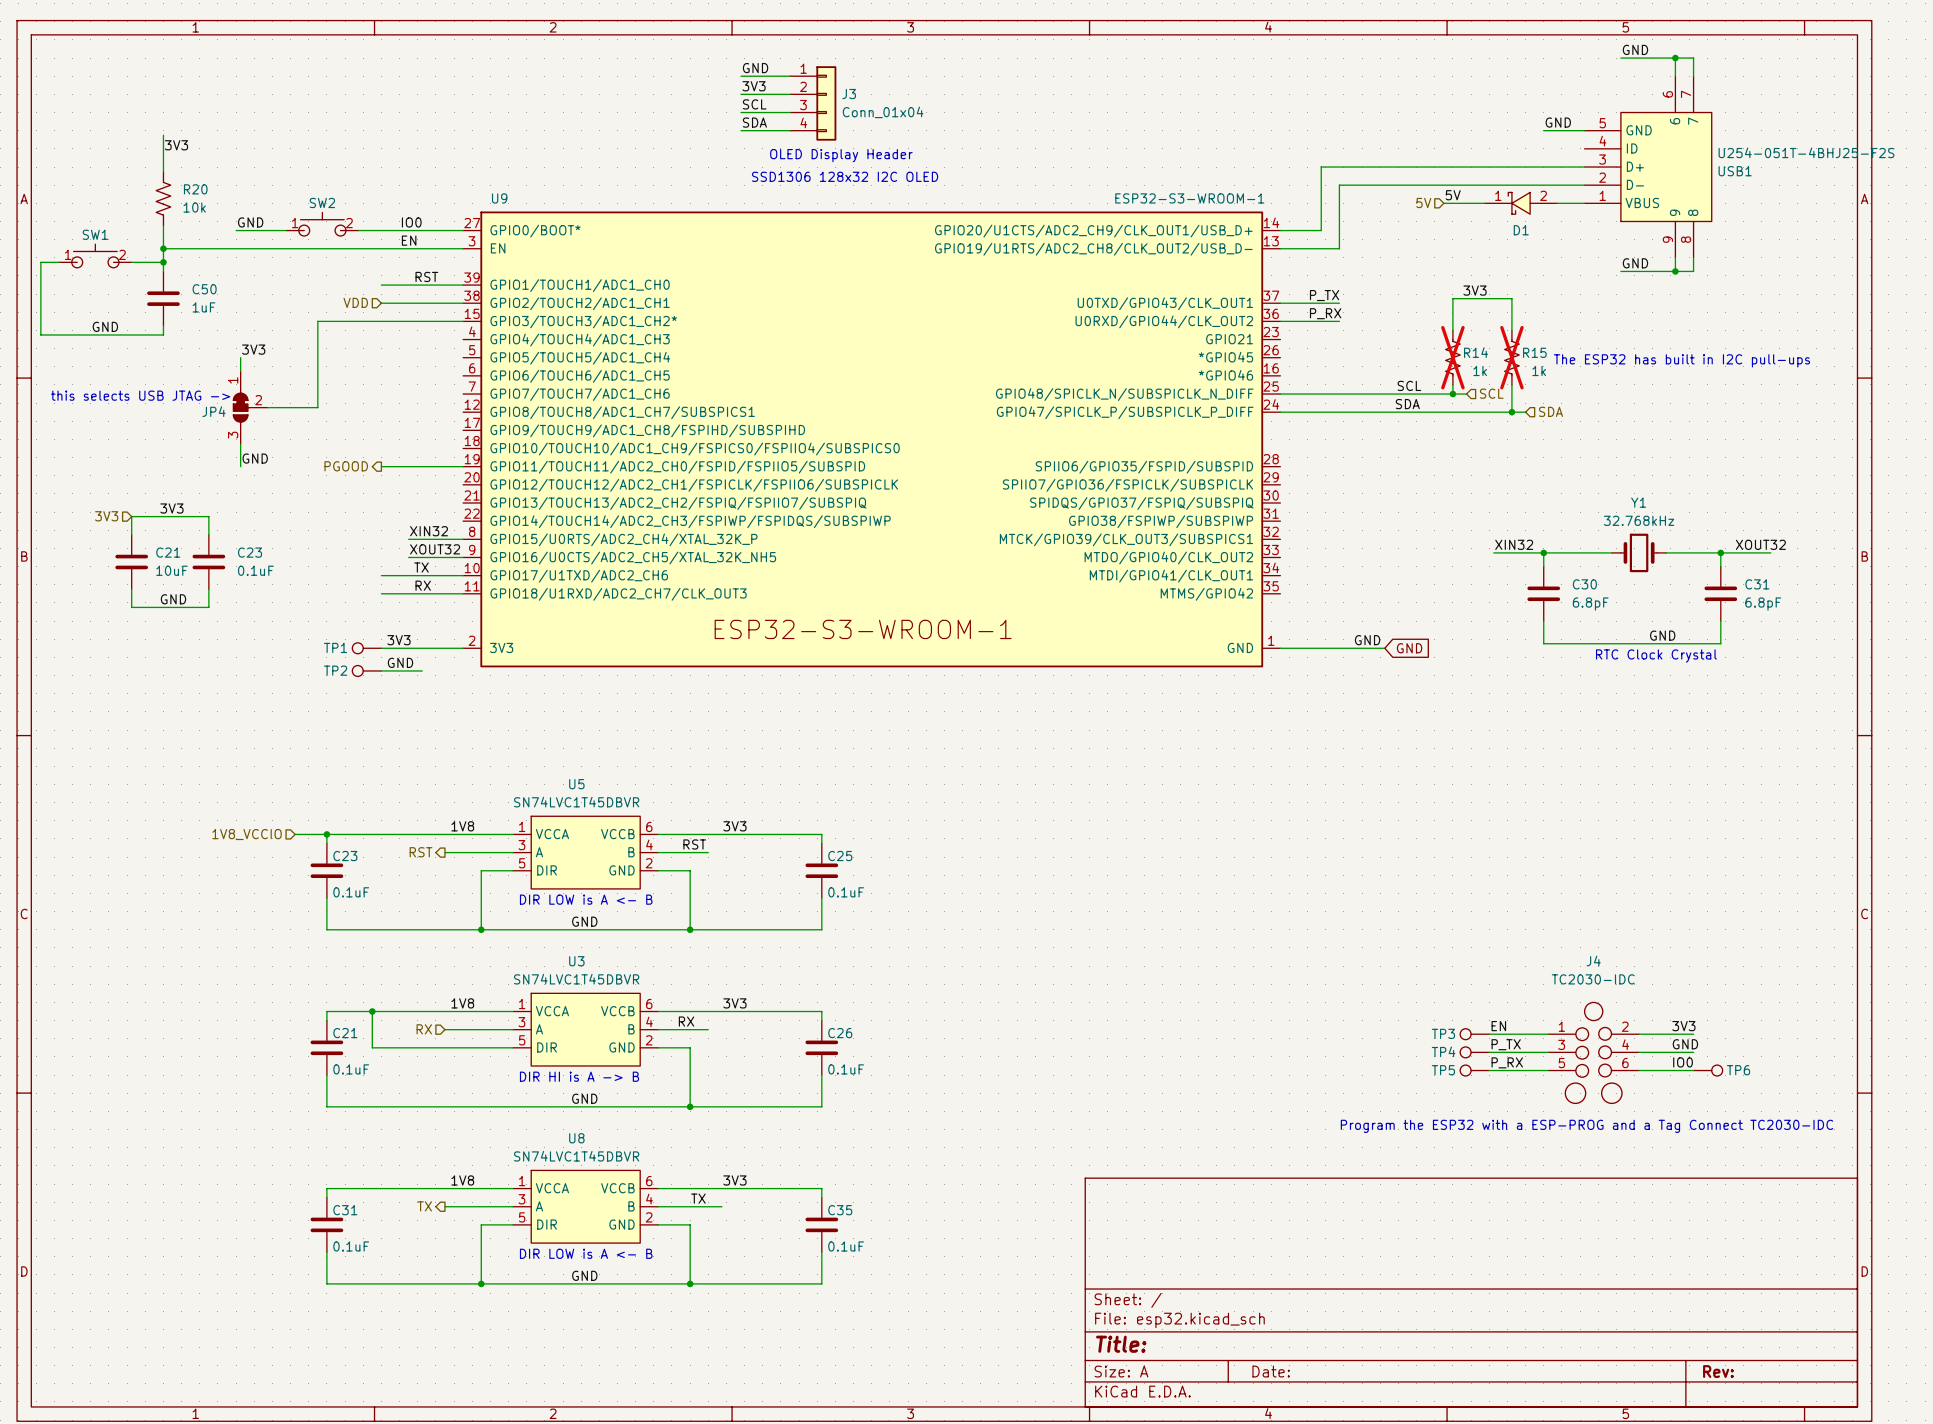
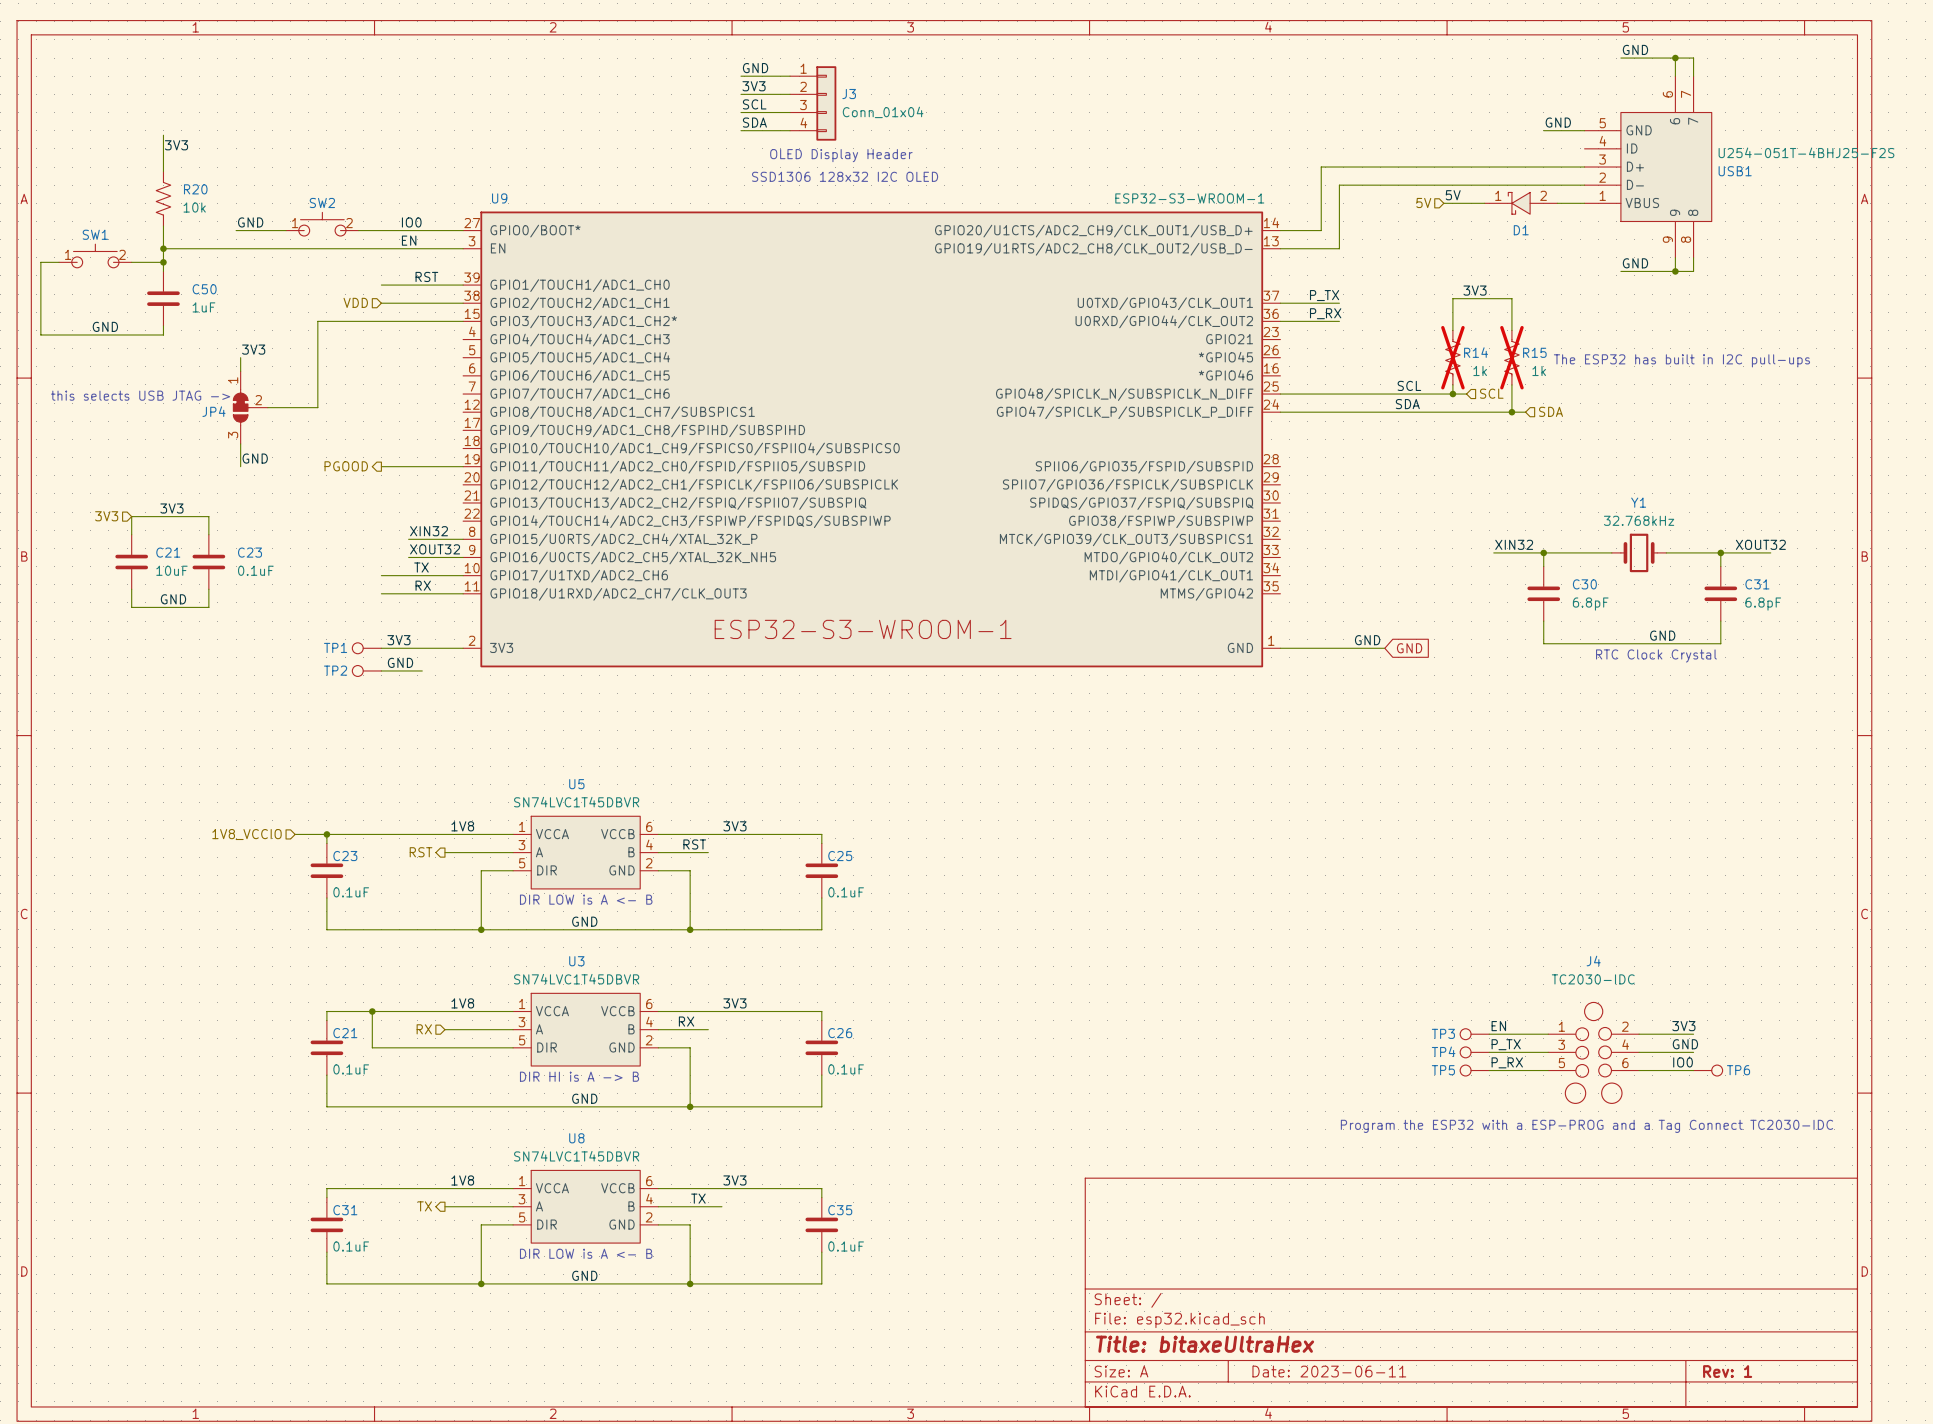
title block: Title: (1121, 1344) -> Title: bitaxeUltraHex (1205, 1344)
title block: Date: (1271, 1371) -> Date: 2023-06-11 (1329, 1371)
title block: Rev: (1718, 1371) -> Rev: 1 (1727, 1371)

